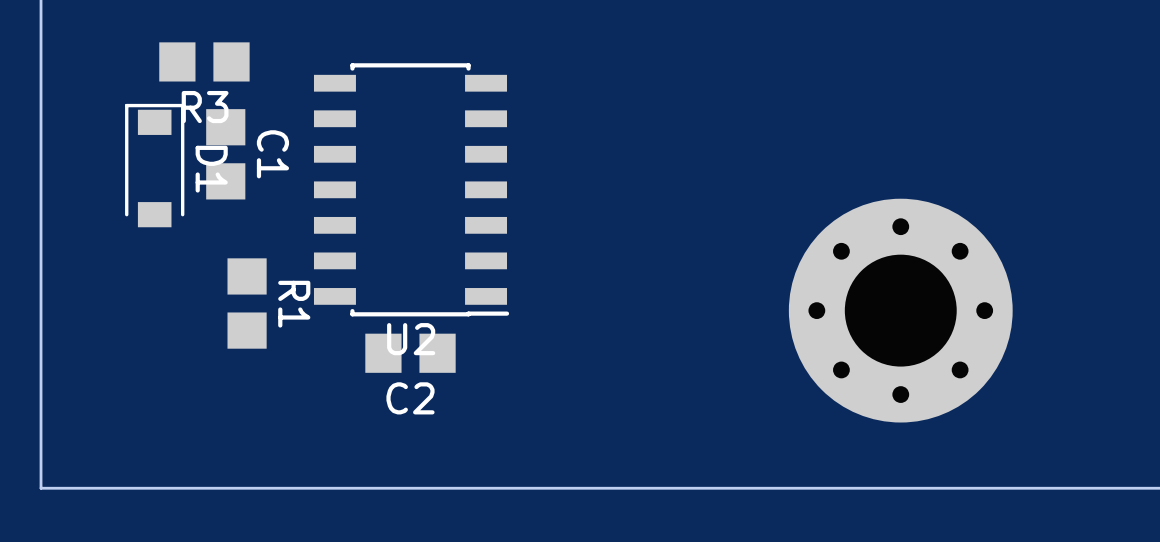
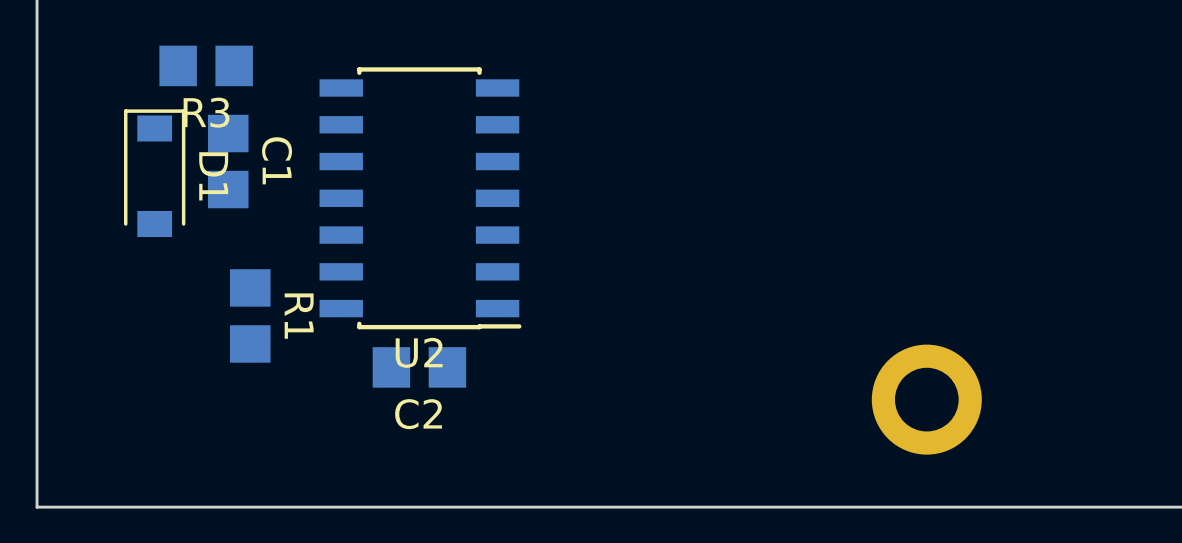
part: (900, 310) -> none
part: none -> (926, 399)

